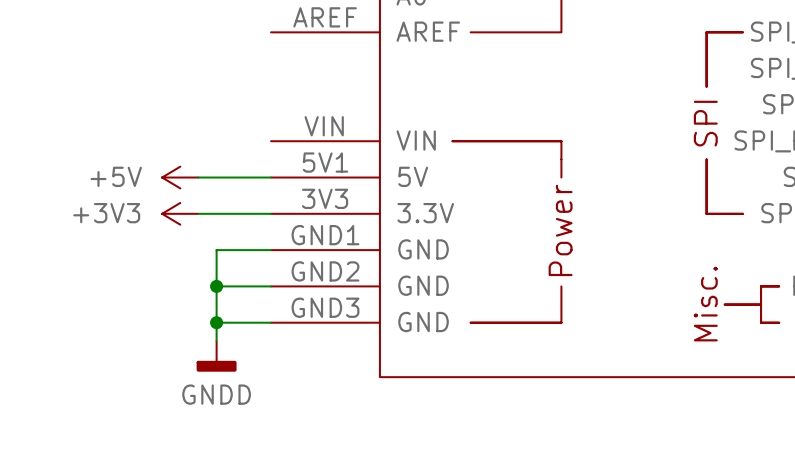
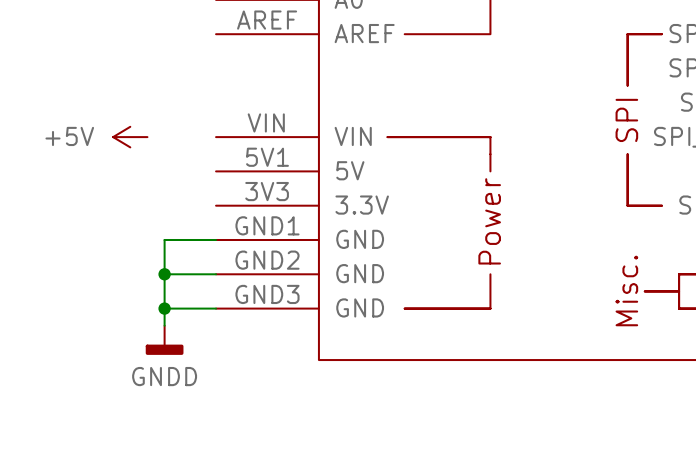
power symbol position: +5V (180, 177) -> +5V (130, 137)
wire: (198, 177) (271, 177) -> none
power symbol: +3V3 (180, 213) -> none
wire: (198, 213) (271, 213) -> none

